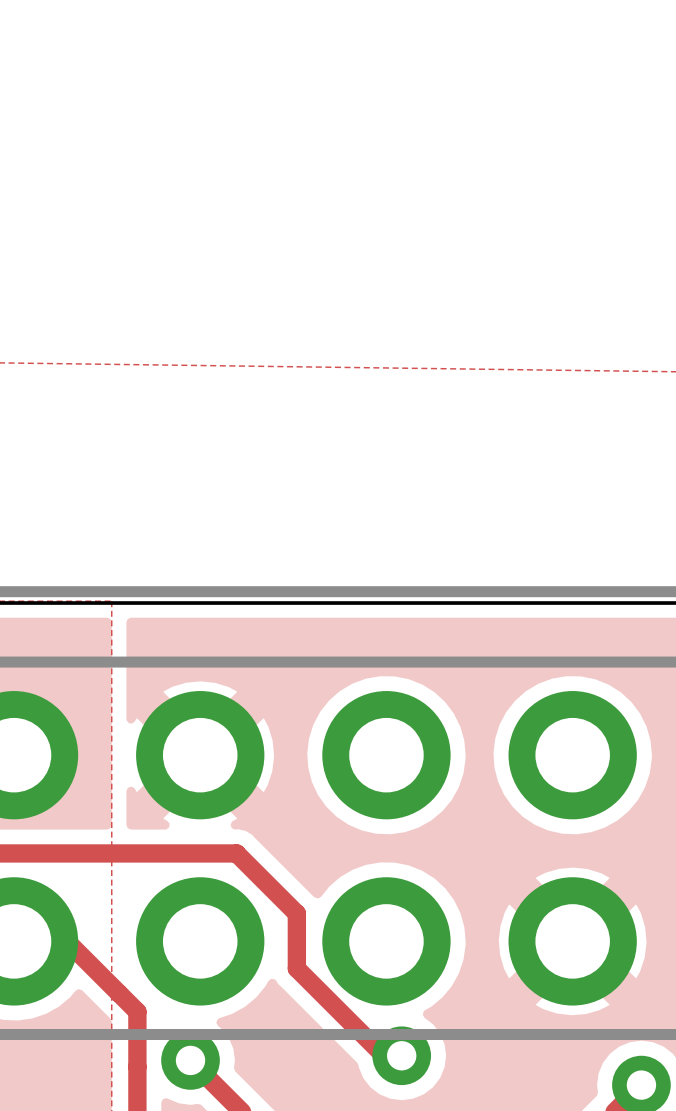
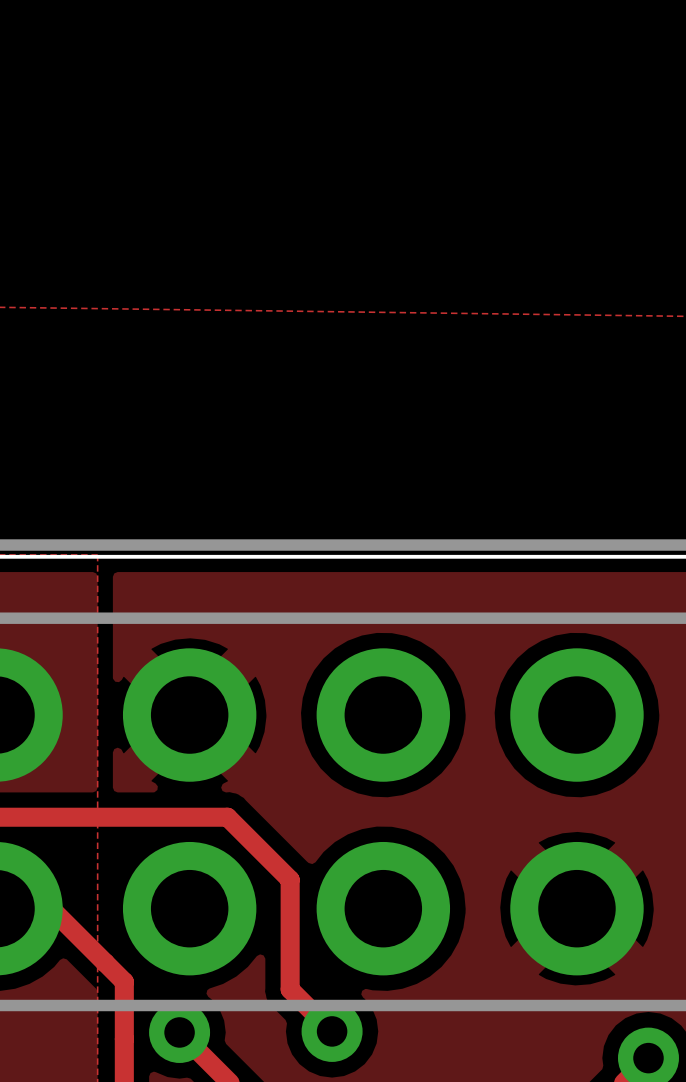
track: (296, 968) (384, 1055) (401, 1055) -> (290, 936) (290, 989) (332, 1031)
via position: (401, 1055) -> (332, 1031)

